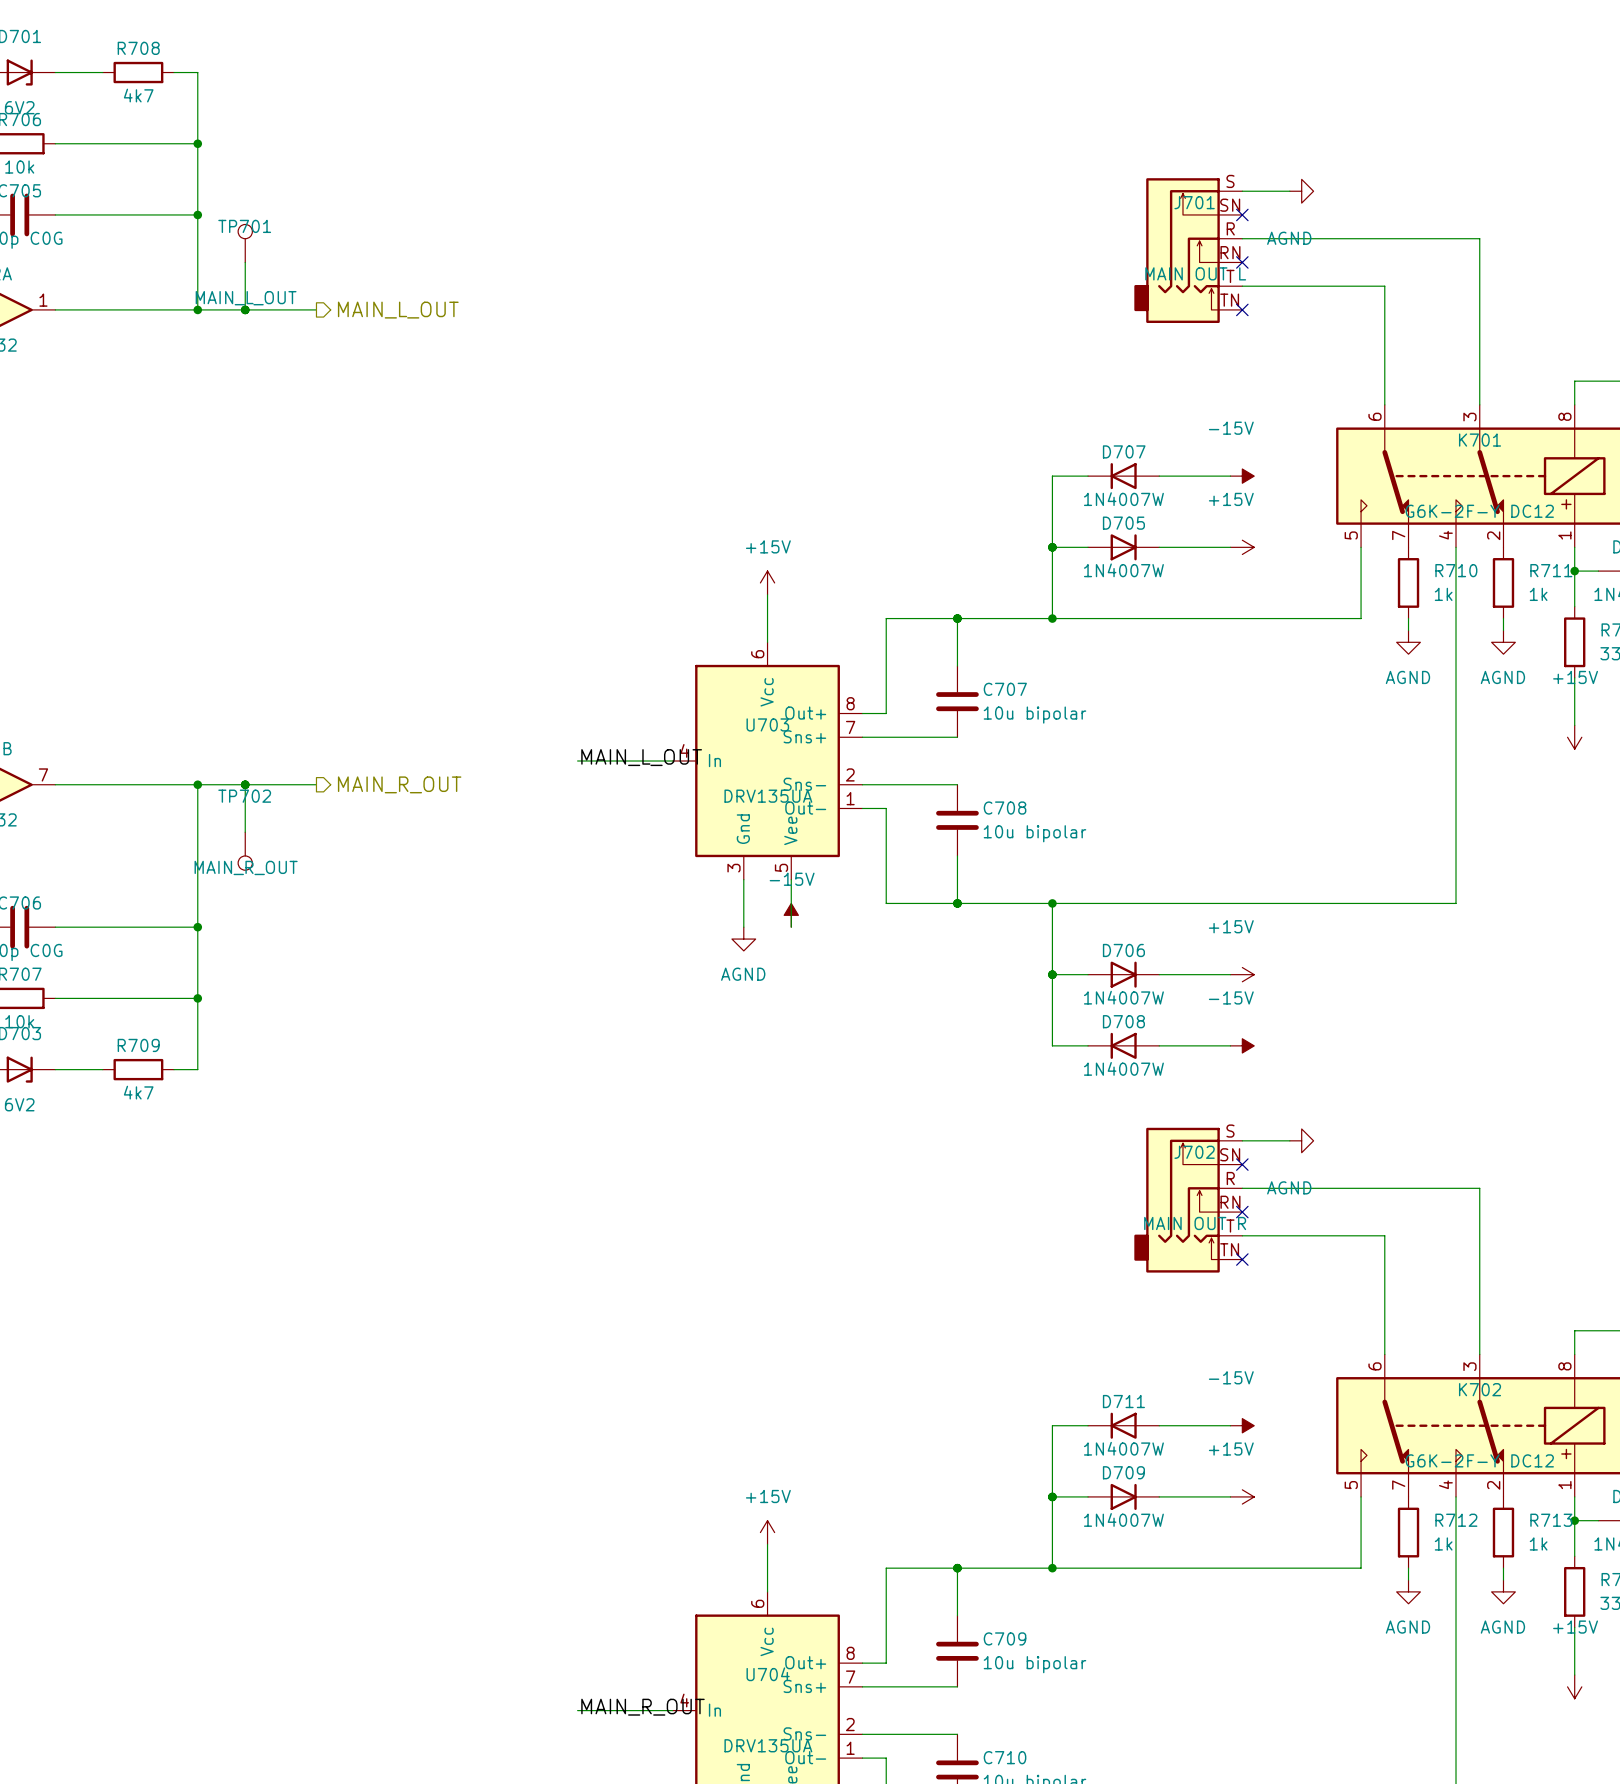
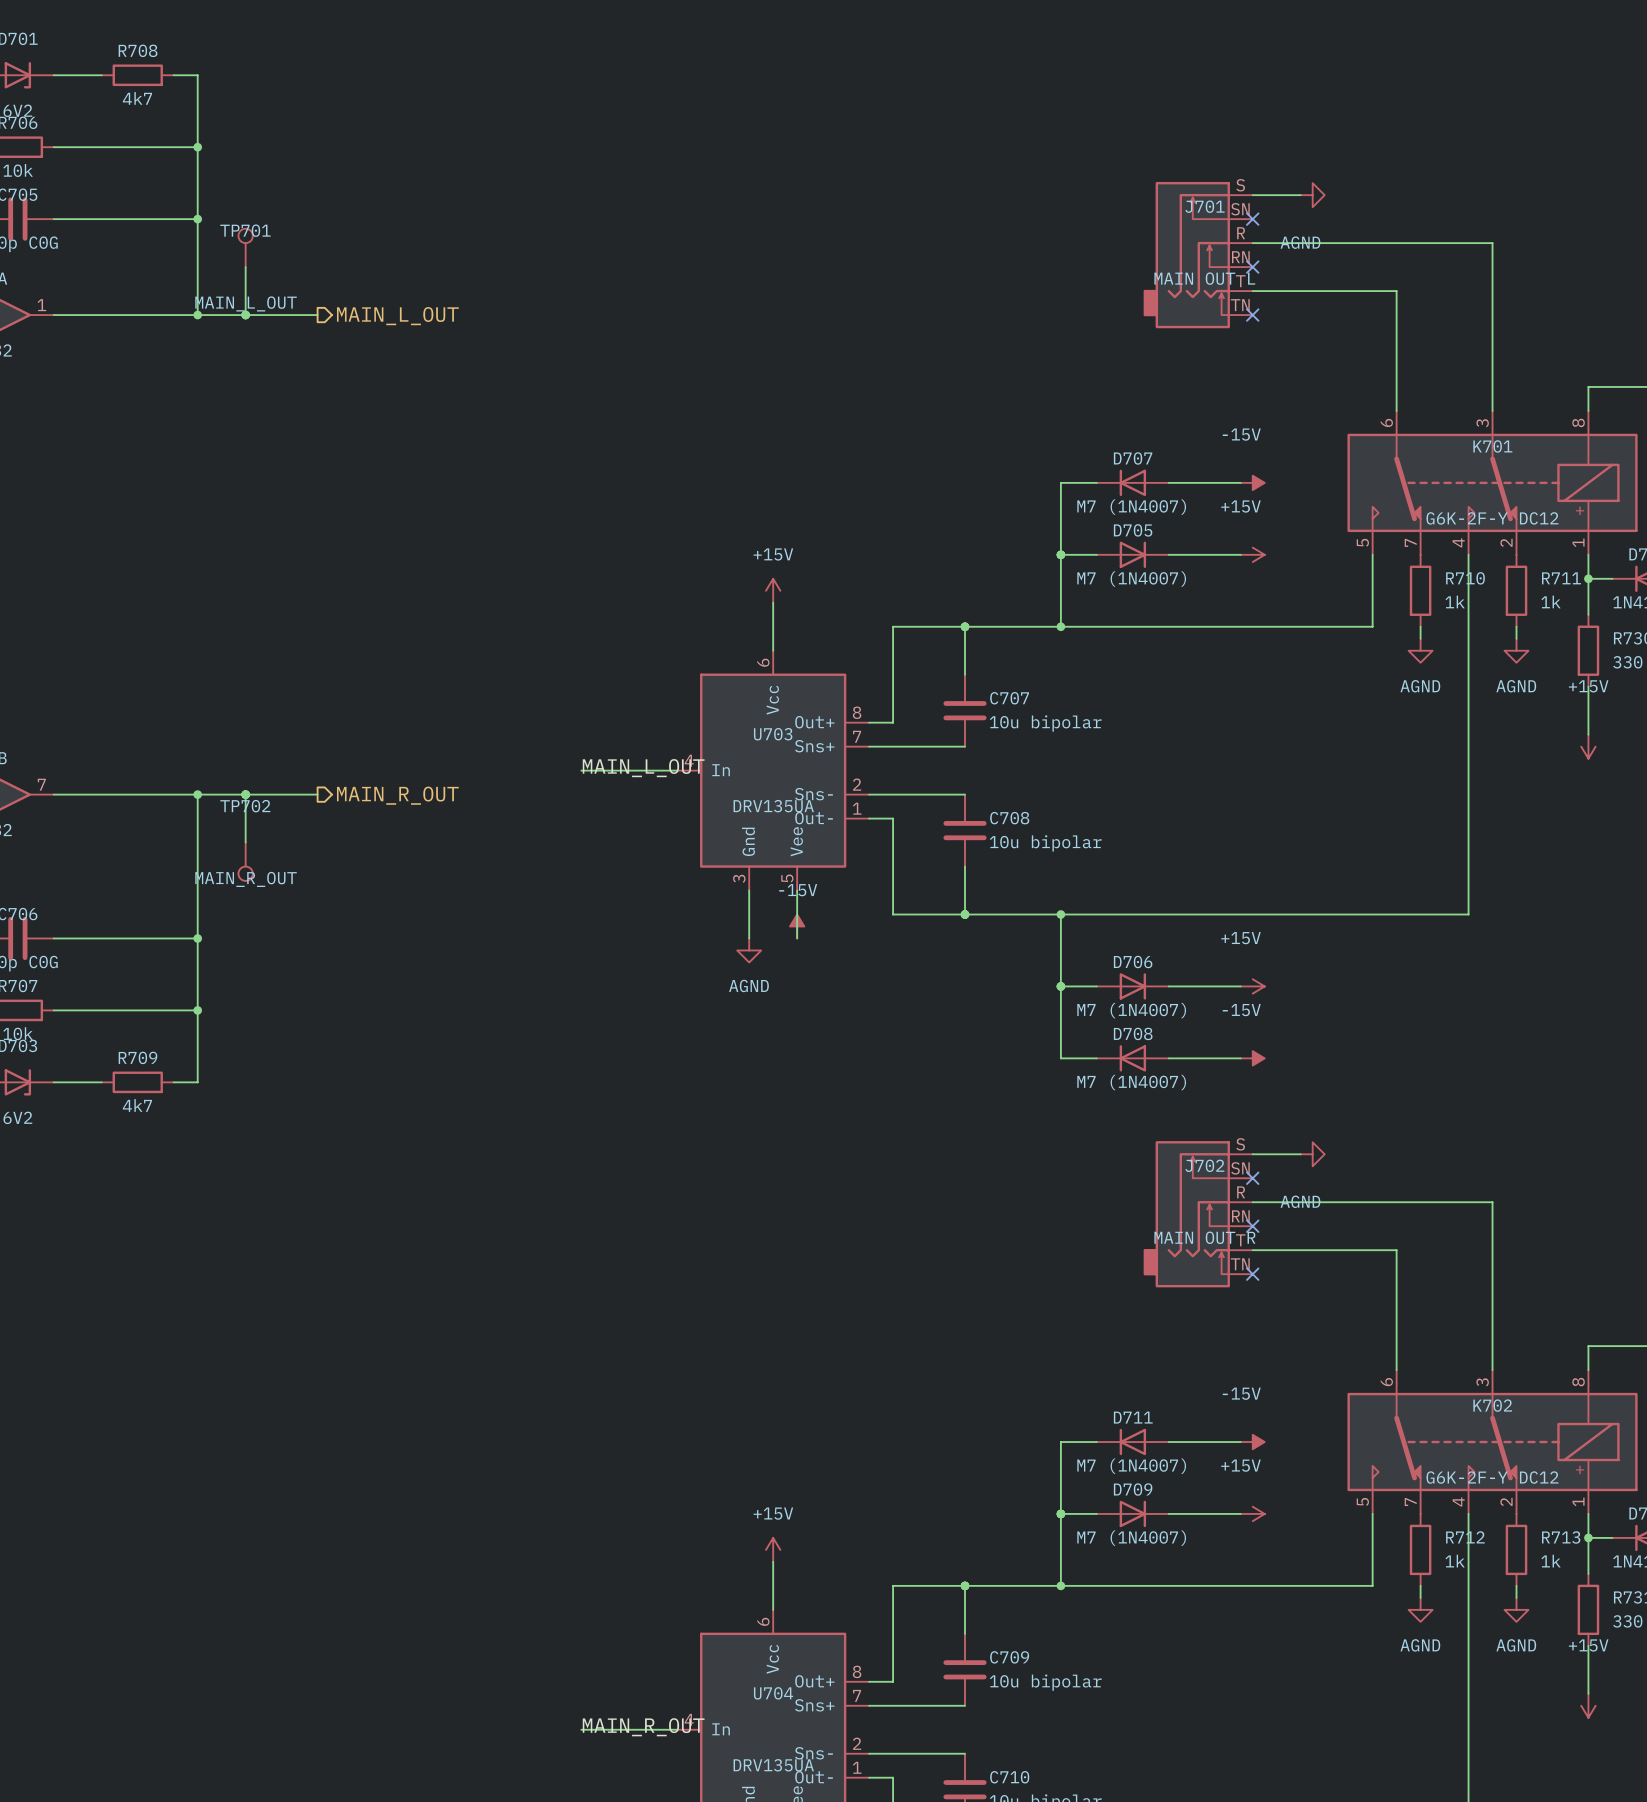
D707 value: 1N4007W (1123, 499) -> M7 (1N4007) (1131, 507)
D705 value: 1N4007W (1123, 570) -> M7 (1N4007) (1131, 579)
D706 value: 1N4007W (1123, 997) -> M7 (1N4007) (1131, 1010)
D708 value: 1N4007W (1123, 1068) -> M7 (1N4007) (1131, 1082)
D711 value: 1N4007W (1123, 1448) -> M7 (1N4007) (1131, 1466)
D709 value: 1N4007W (1123, 1519) -> M7 (1N4007) (1131, 1538)

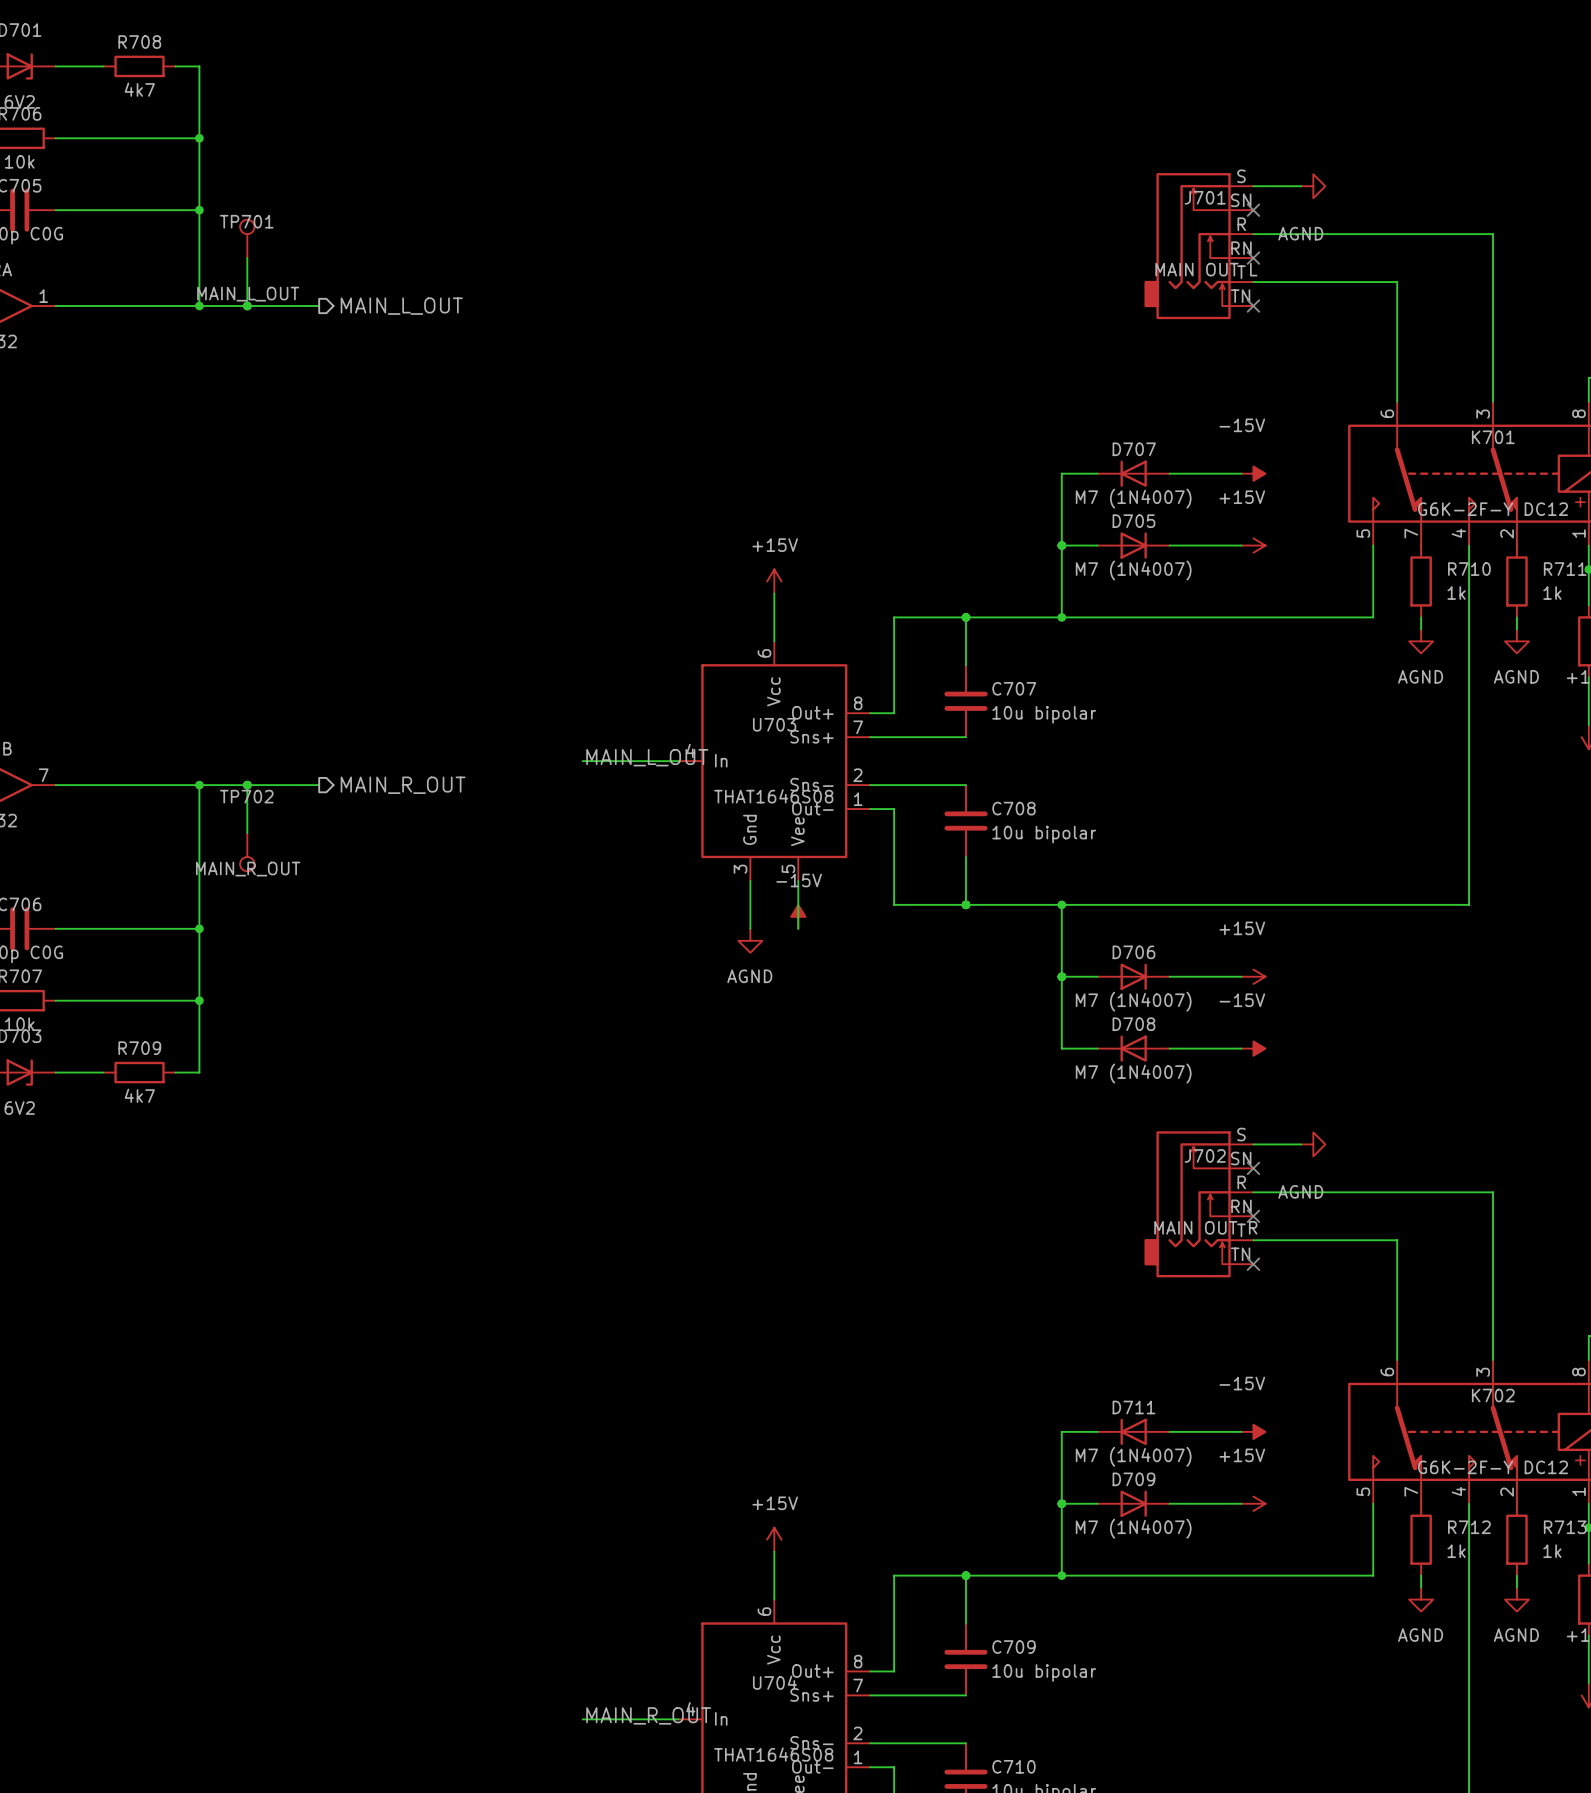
U703 value: DRV135UA (773, 806) -> THAT1646S08 (773, 796)
U704 value: DRV135UA (773, 1765) -> THAT1646S08 (773, 1754)

